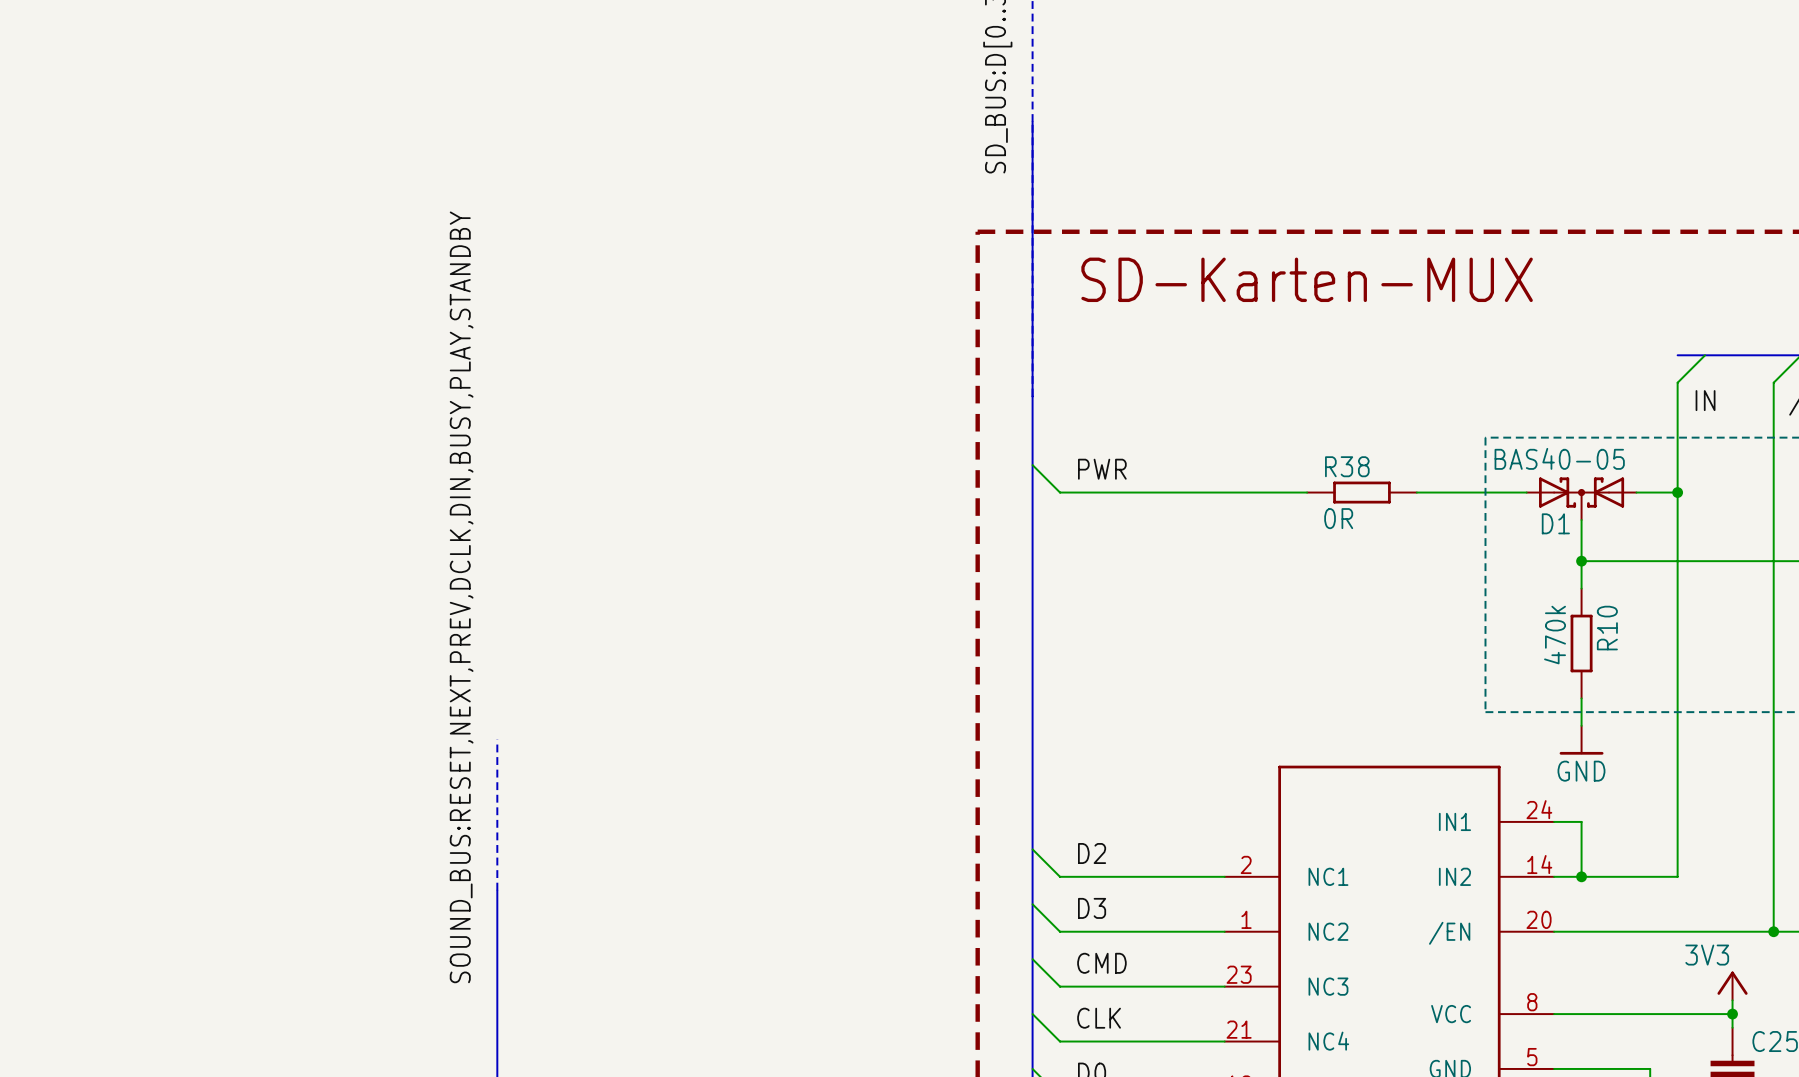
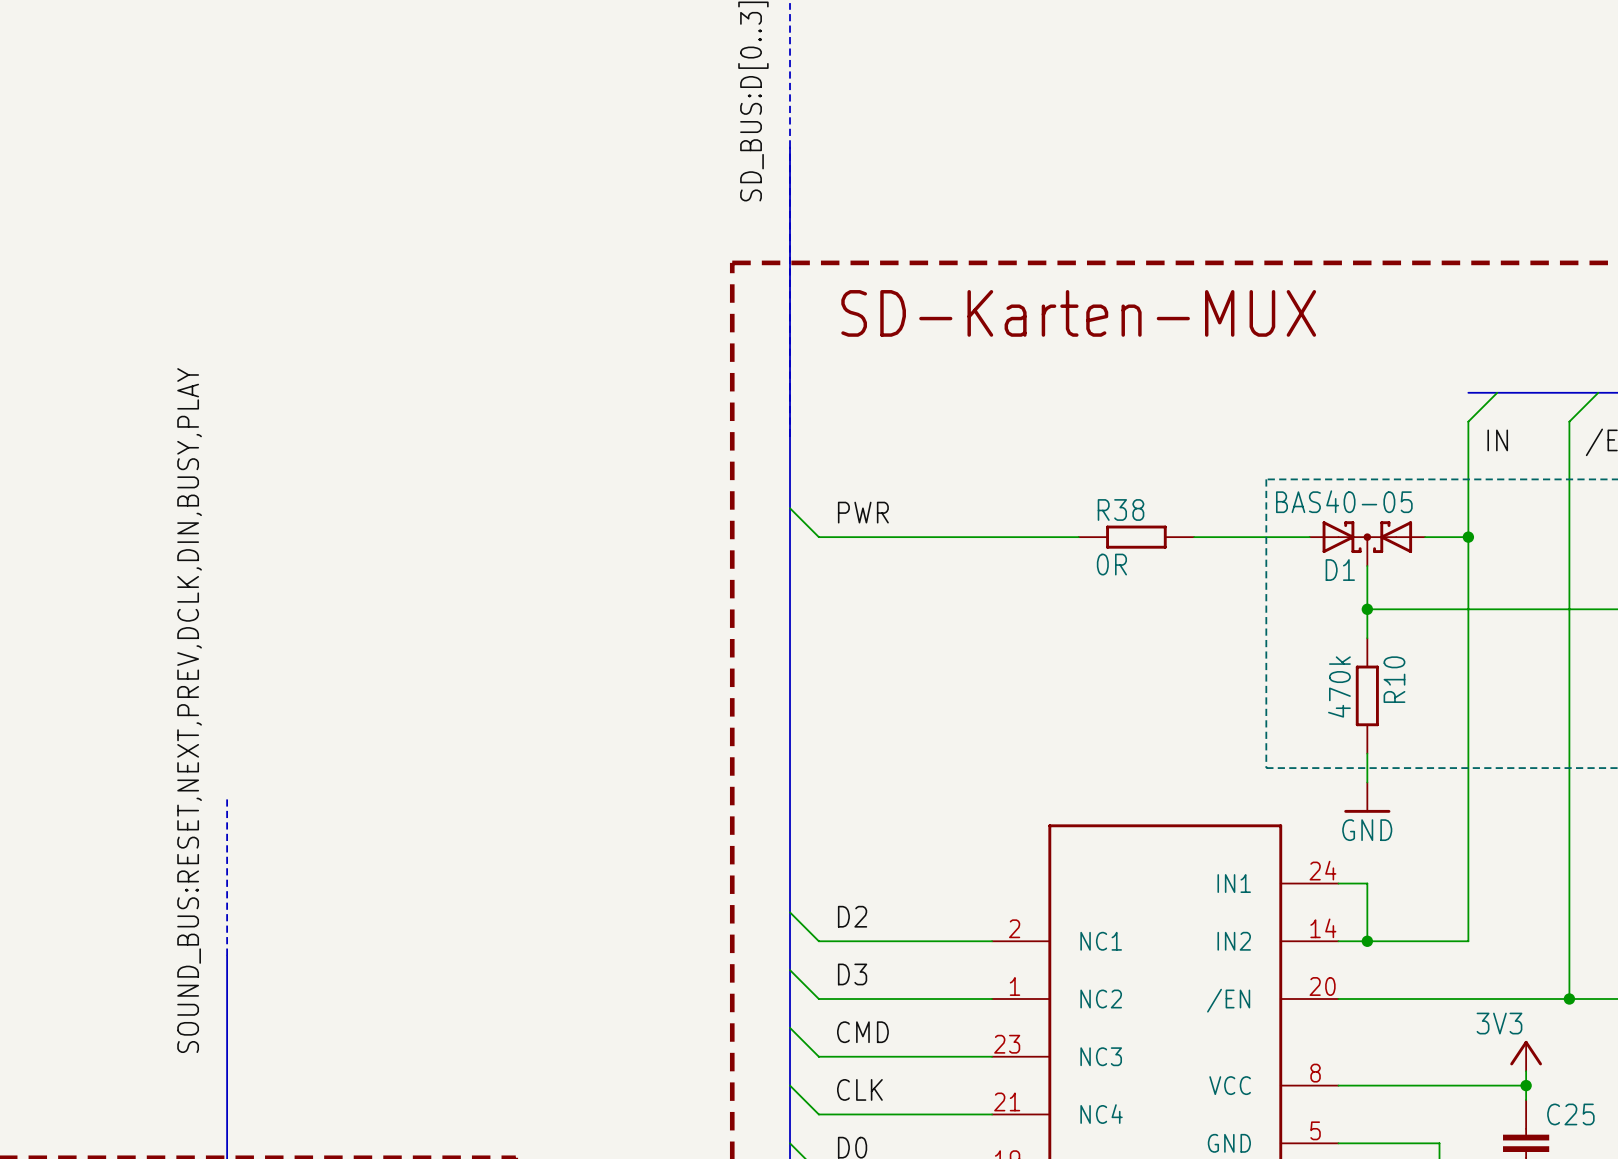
label: SOUND_BUS:RESET,NEXT,PREV,DCLK,DIN,BUSY,PLAY,STANDBY (461, 597) -> SOUND_BUS:RESET,NEXT,PREV,DCLK,DIN,BUSY,PLAY (189, 710)

